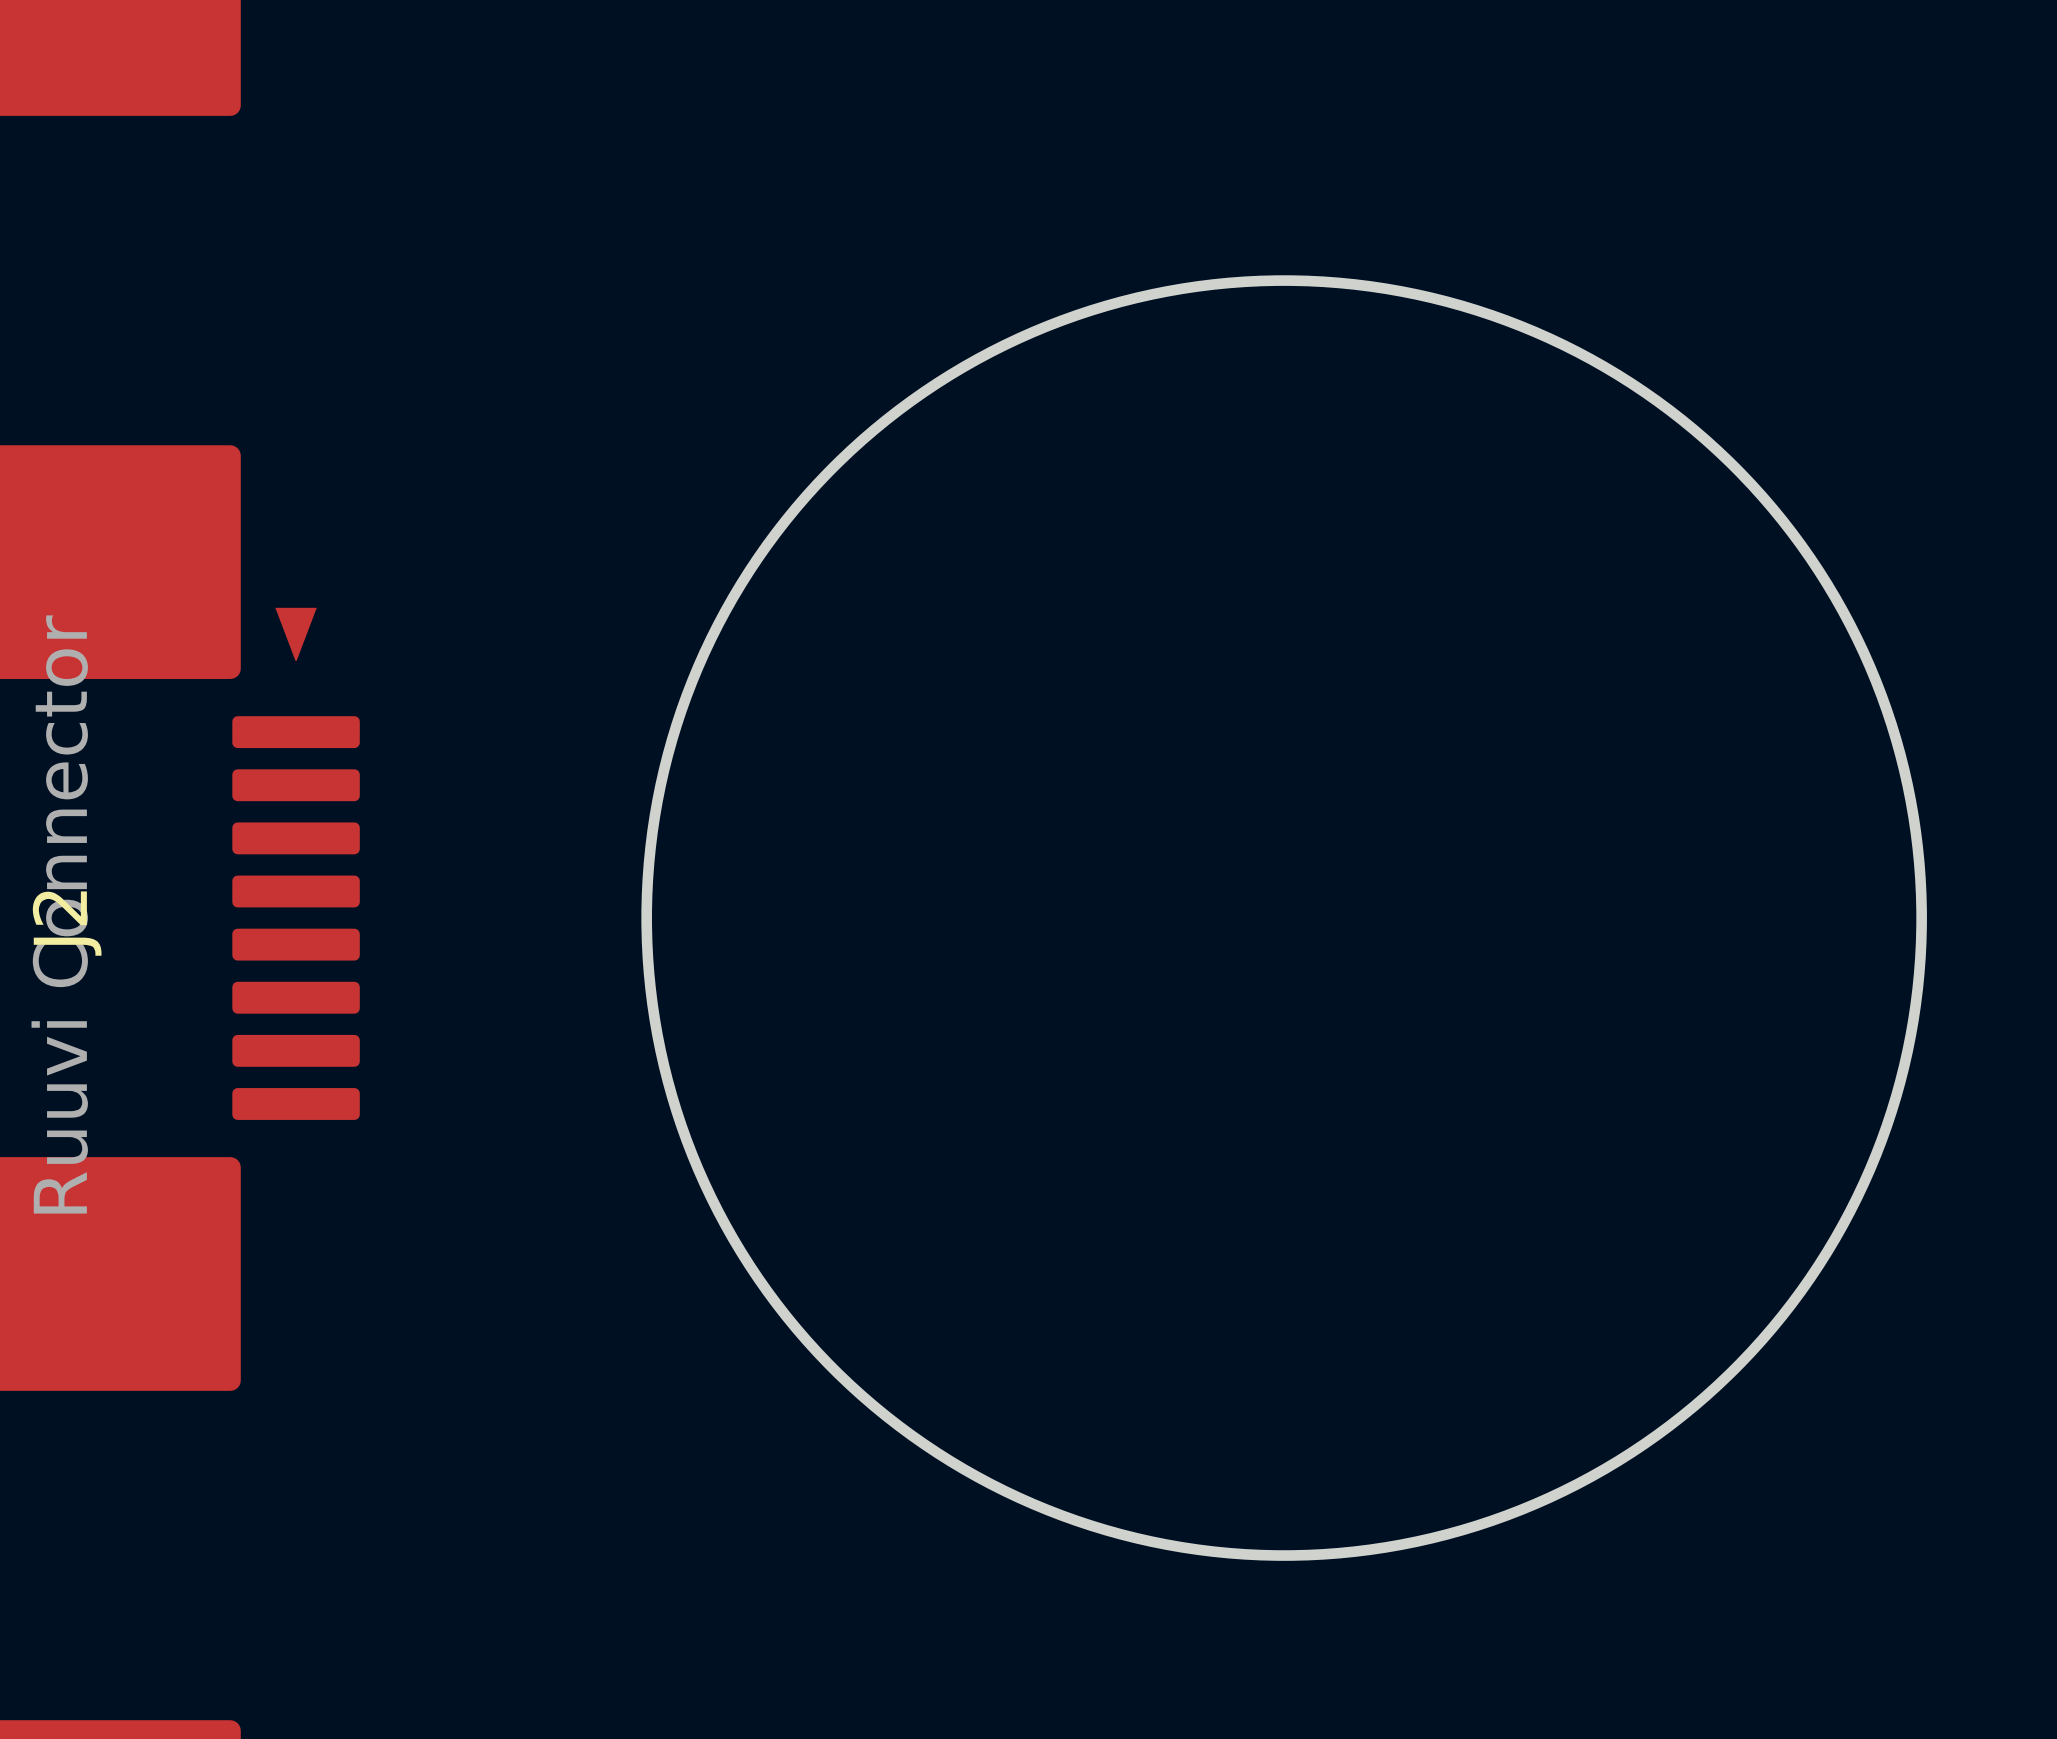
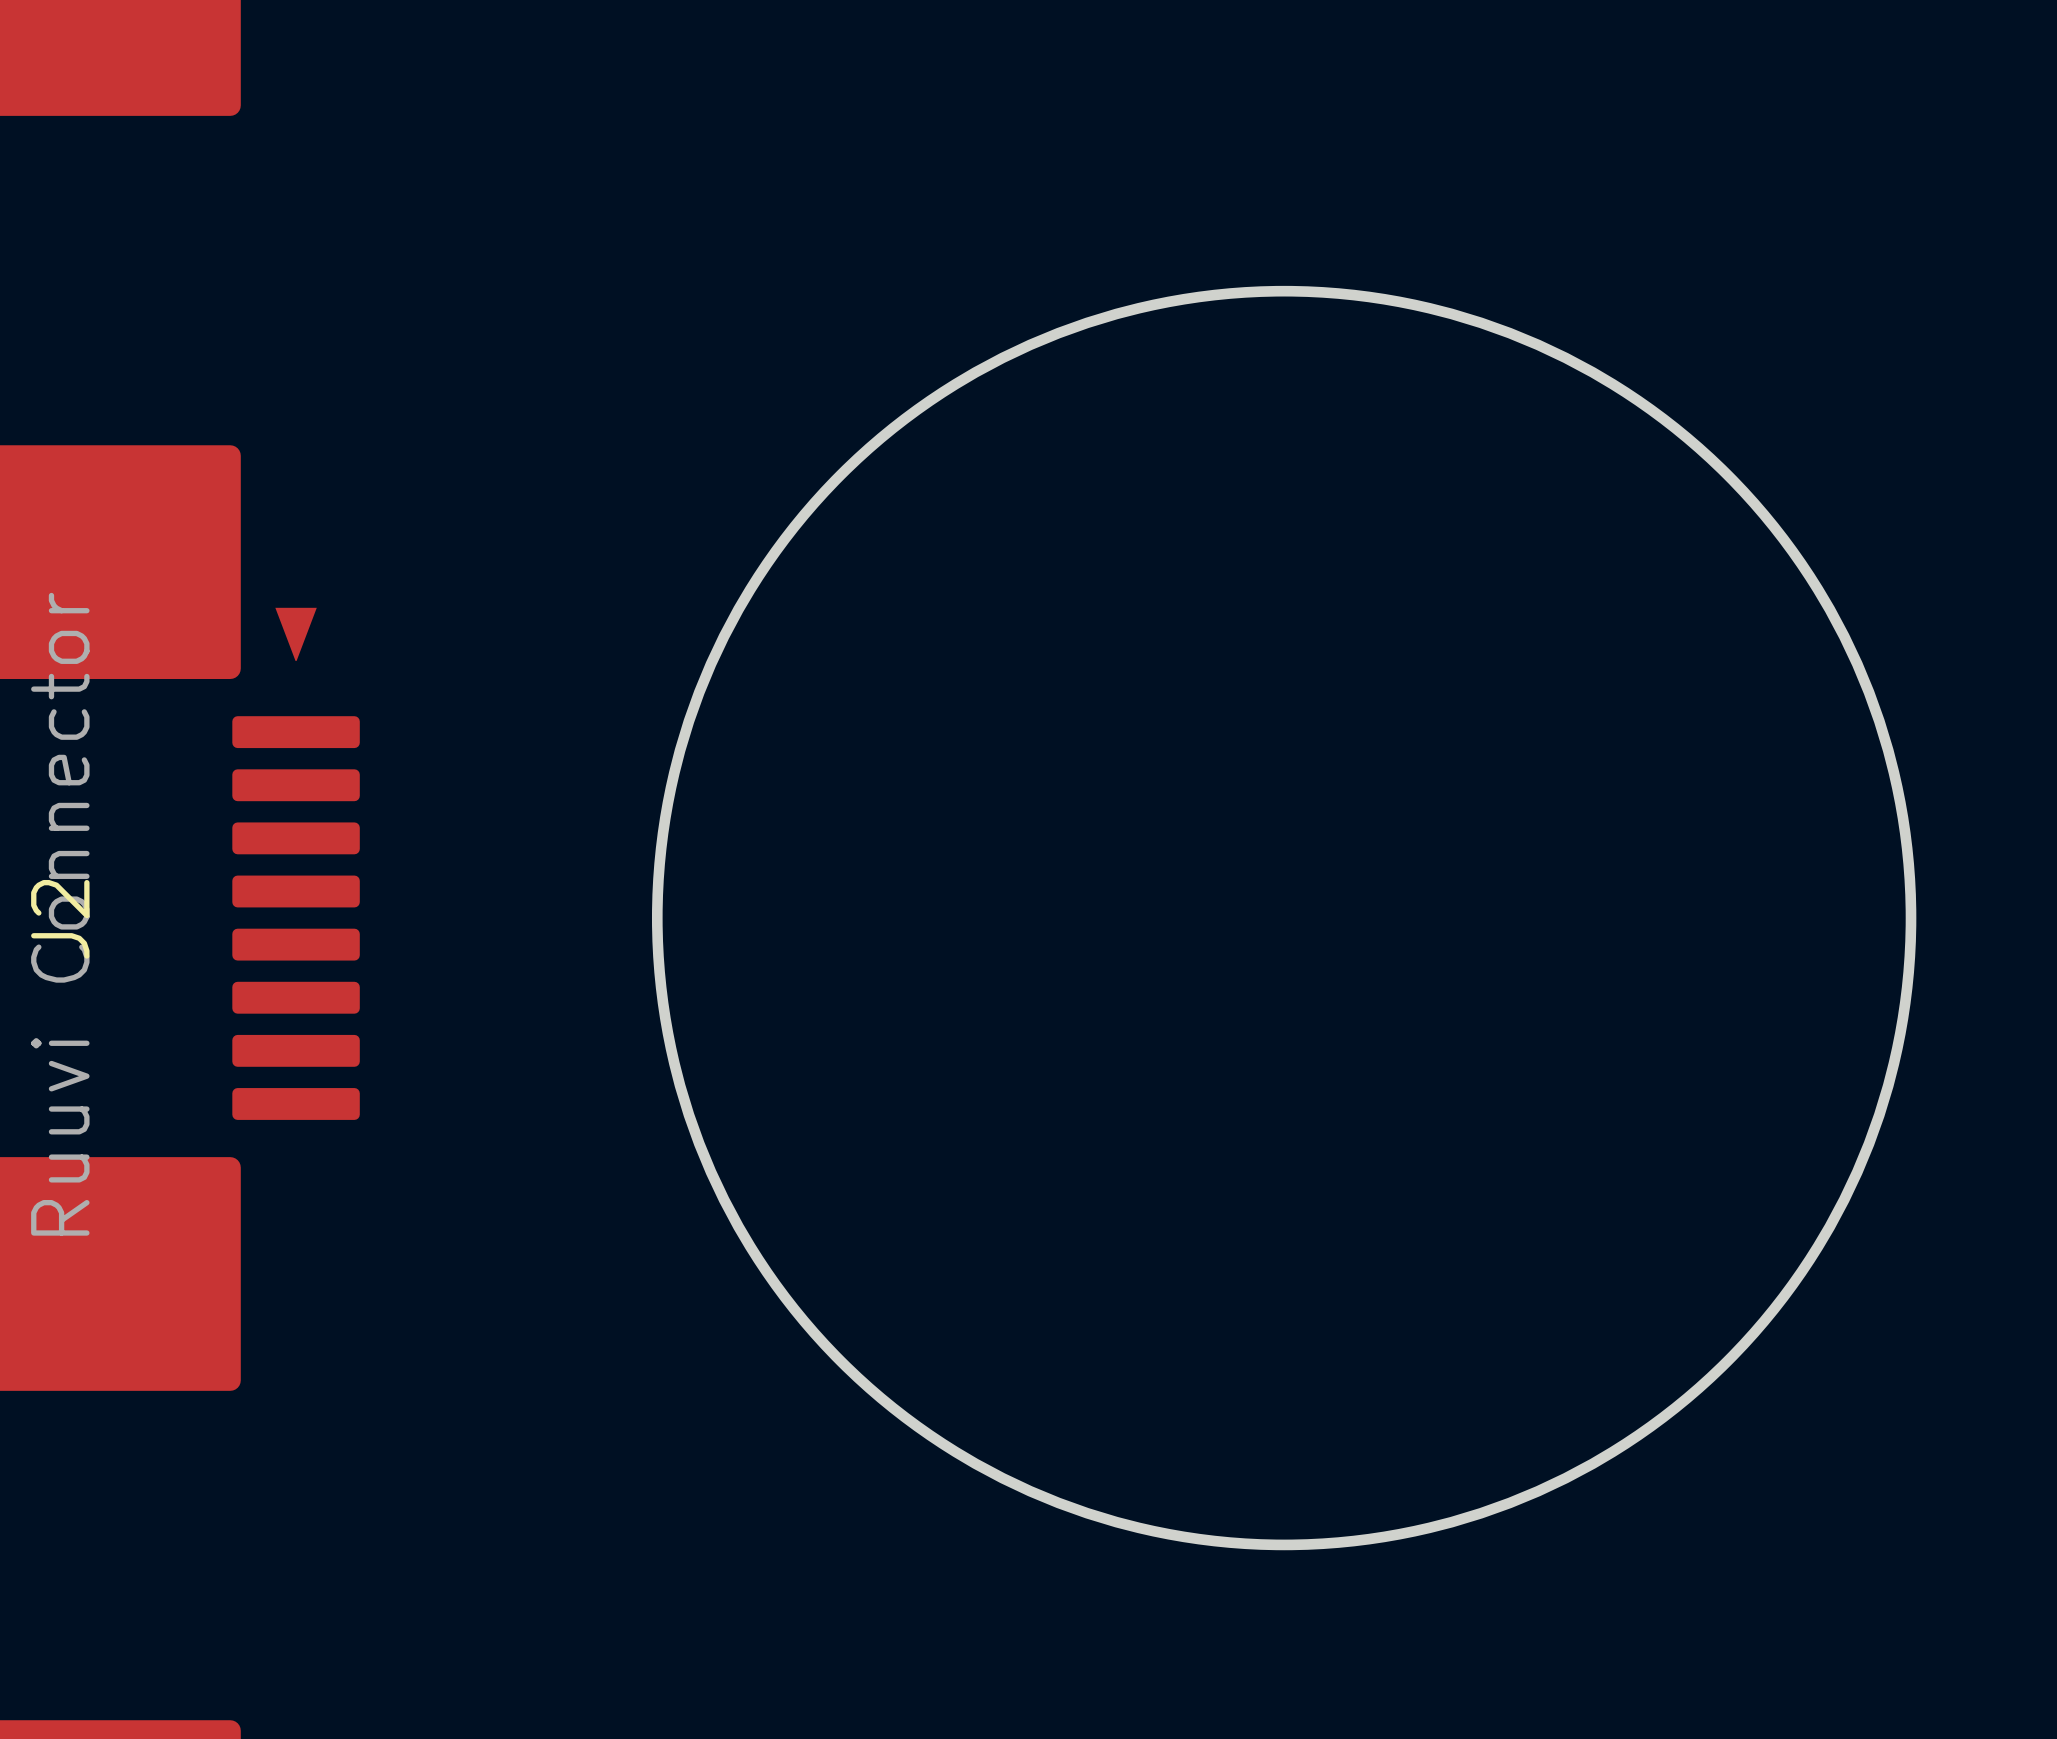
round board edge size: [641, 275, 1927, 1561] -> [651, 285, 1917, 1551]

